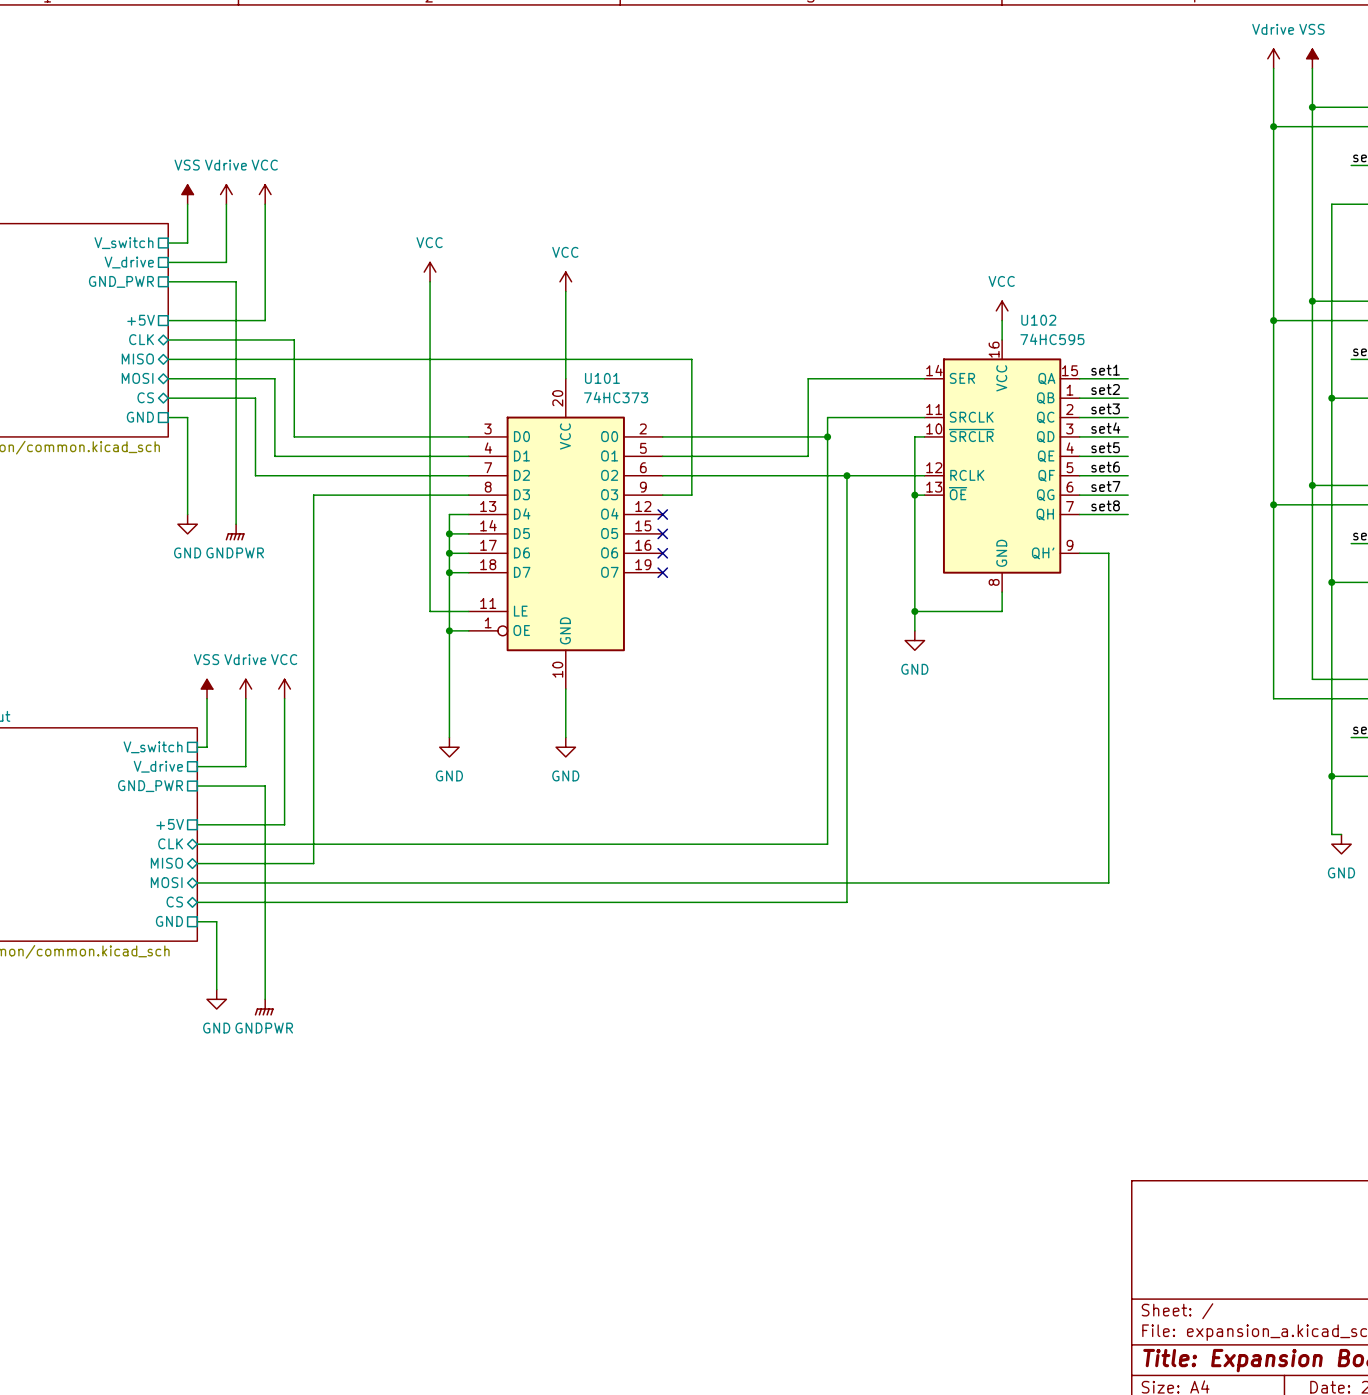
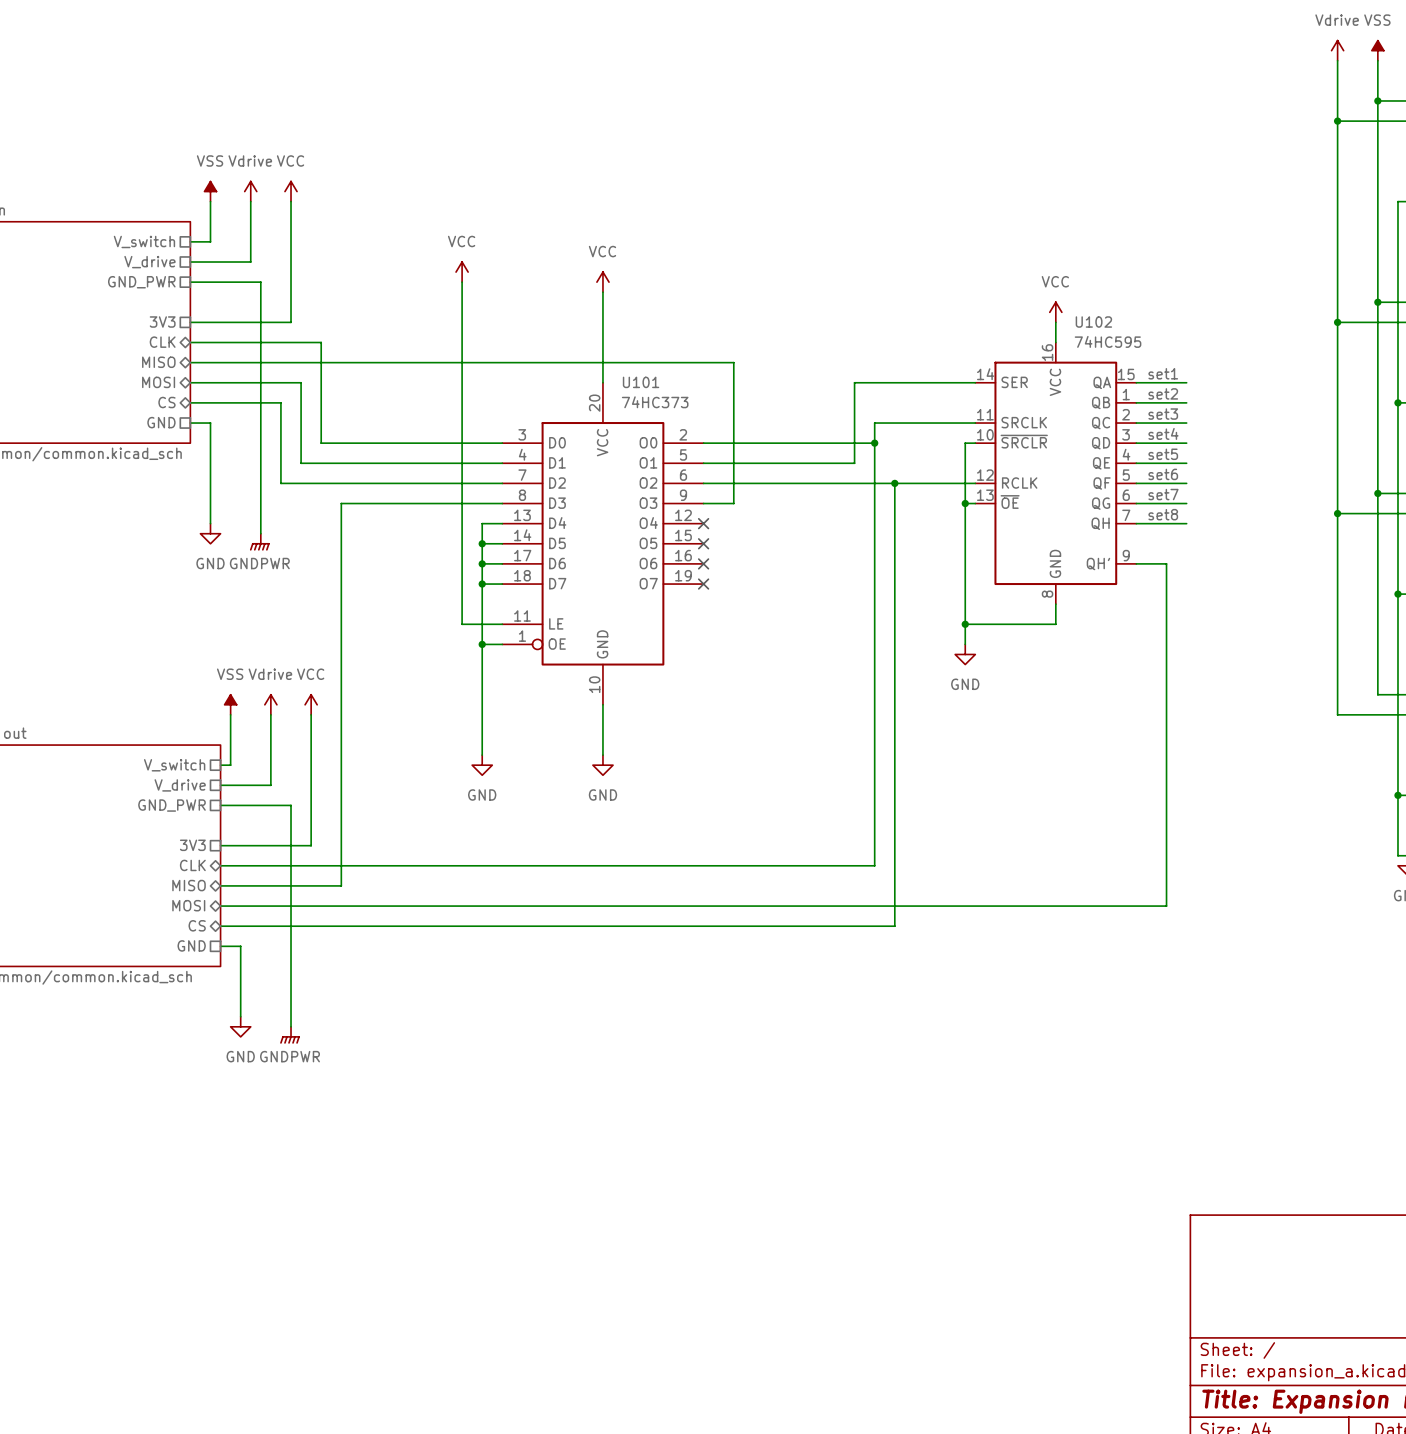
sheet pin: +5V (141, 320) -> 3V3 (162, 322)
sheet pin: +5V (170, 824) -> 3V3 (192, 845)

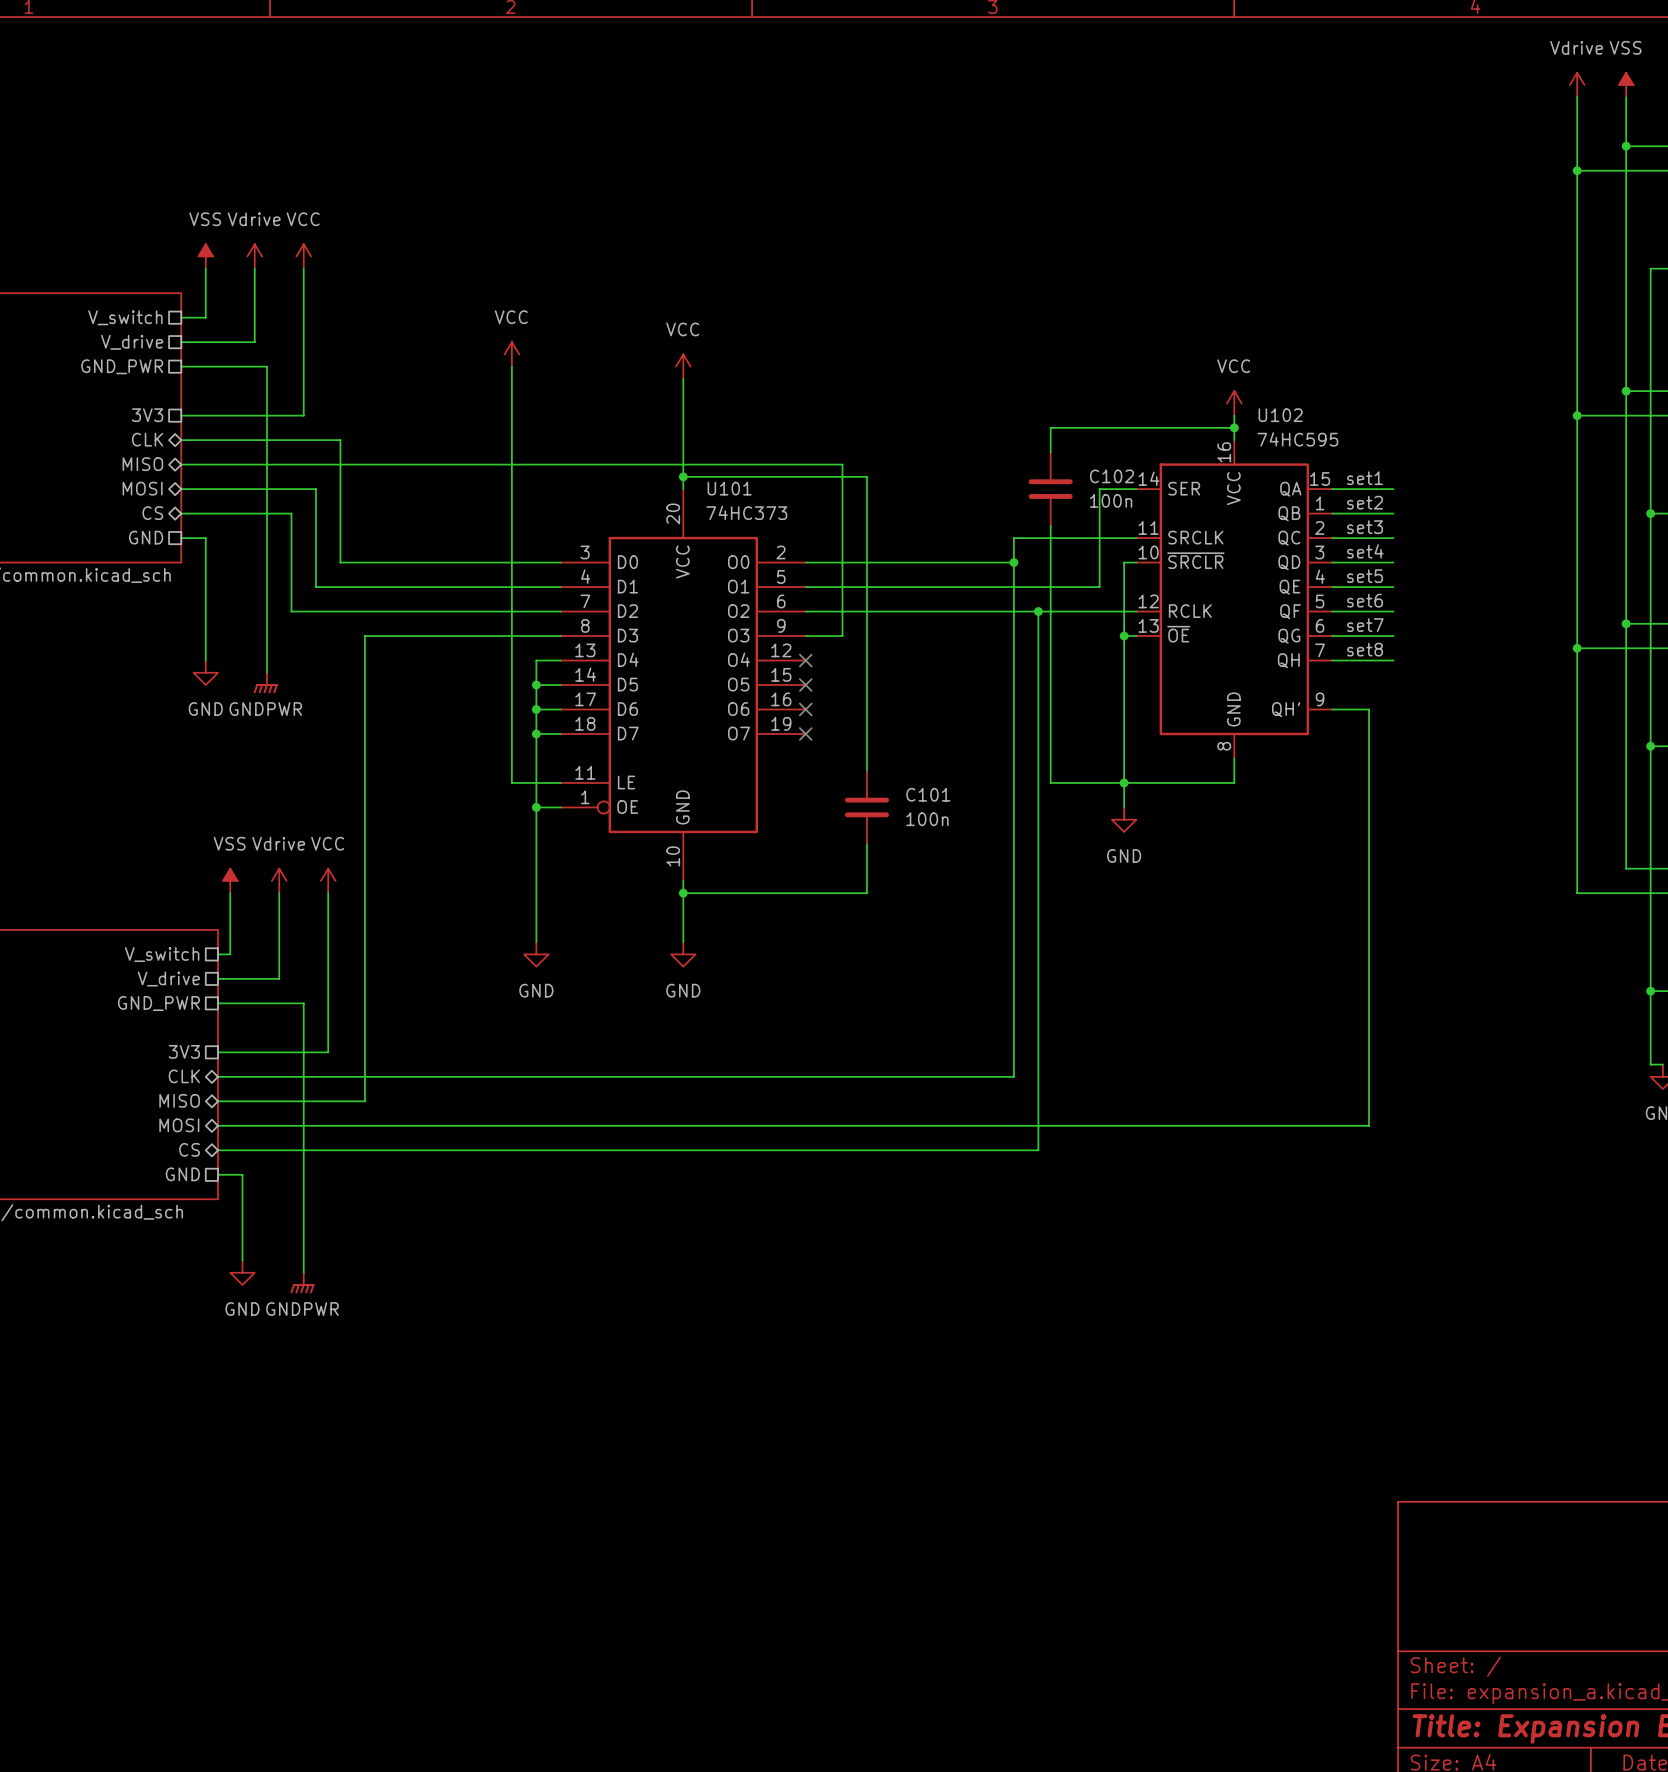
wire: none -> (1234, 427) (1050, 427) (1050, 452)
junction: none -> (1234, 427)
wire: none -> (683, 476) (866, 476) (866, 770)
junction: none -> (683, 476)
C102: none -> 100n (1050, 489)
wire: (945, 382) (854, 382) (854, 463) -> (1099, 489) (1099, 587) (989, 587)
wire: none -> (1050, 525) (1050, 782) (1124, 782)
C101: none -> 100n (866, 807)
wire: none -> (866, 844) (866, 893) (683, 893)
junction: none -> (683, 893)

